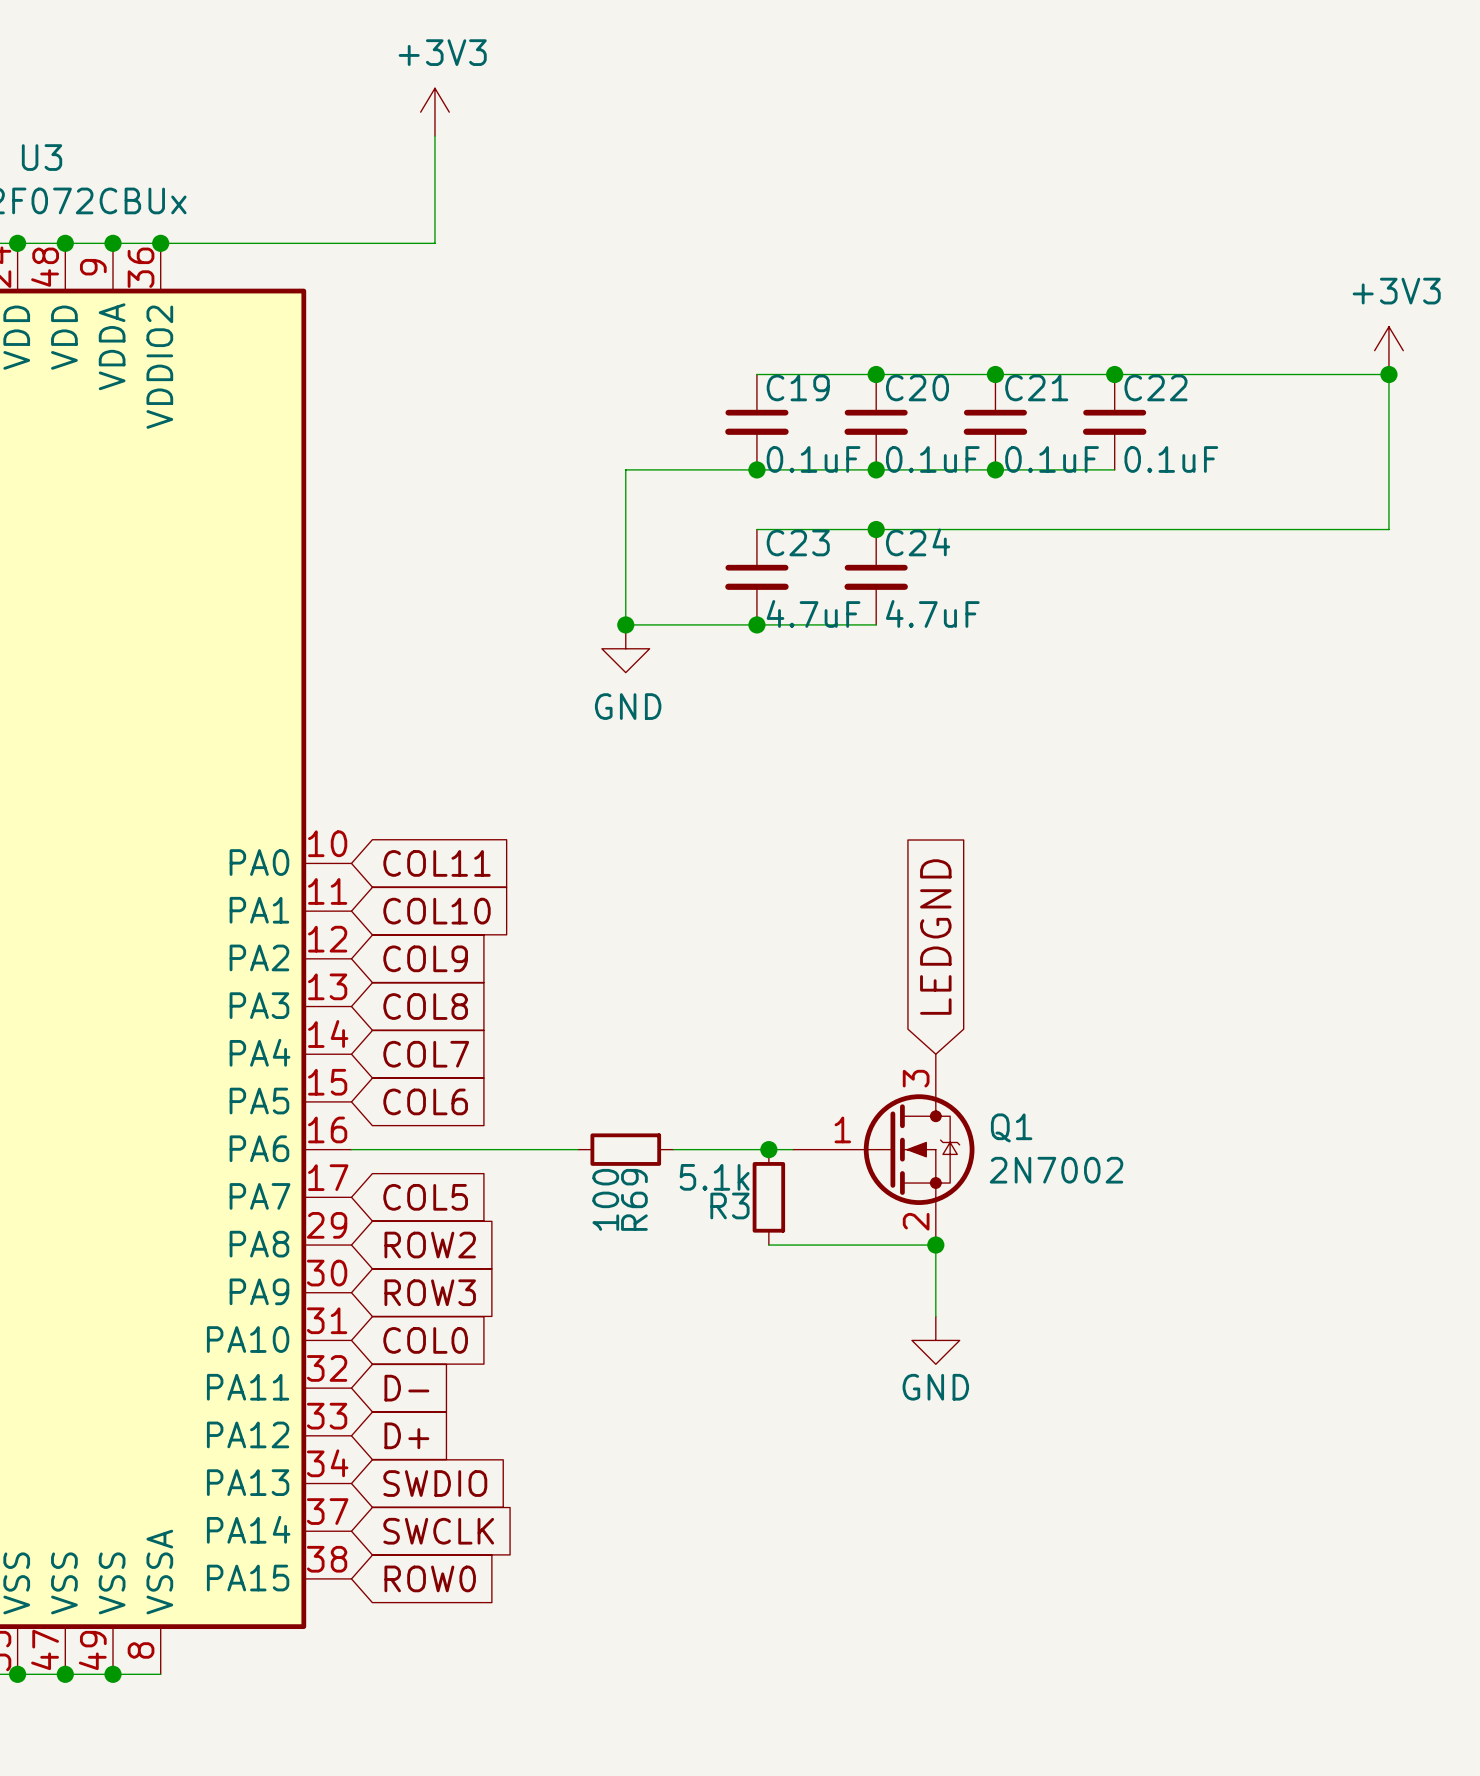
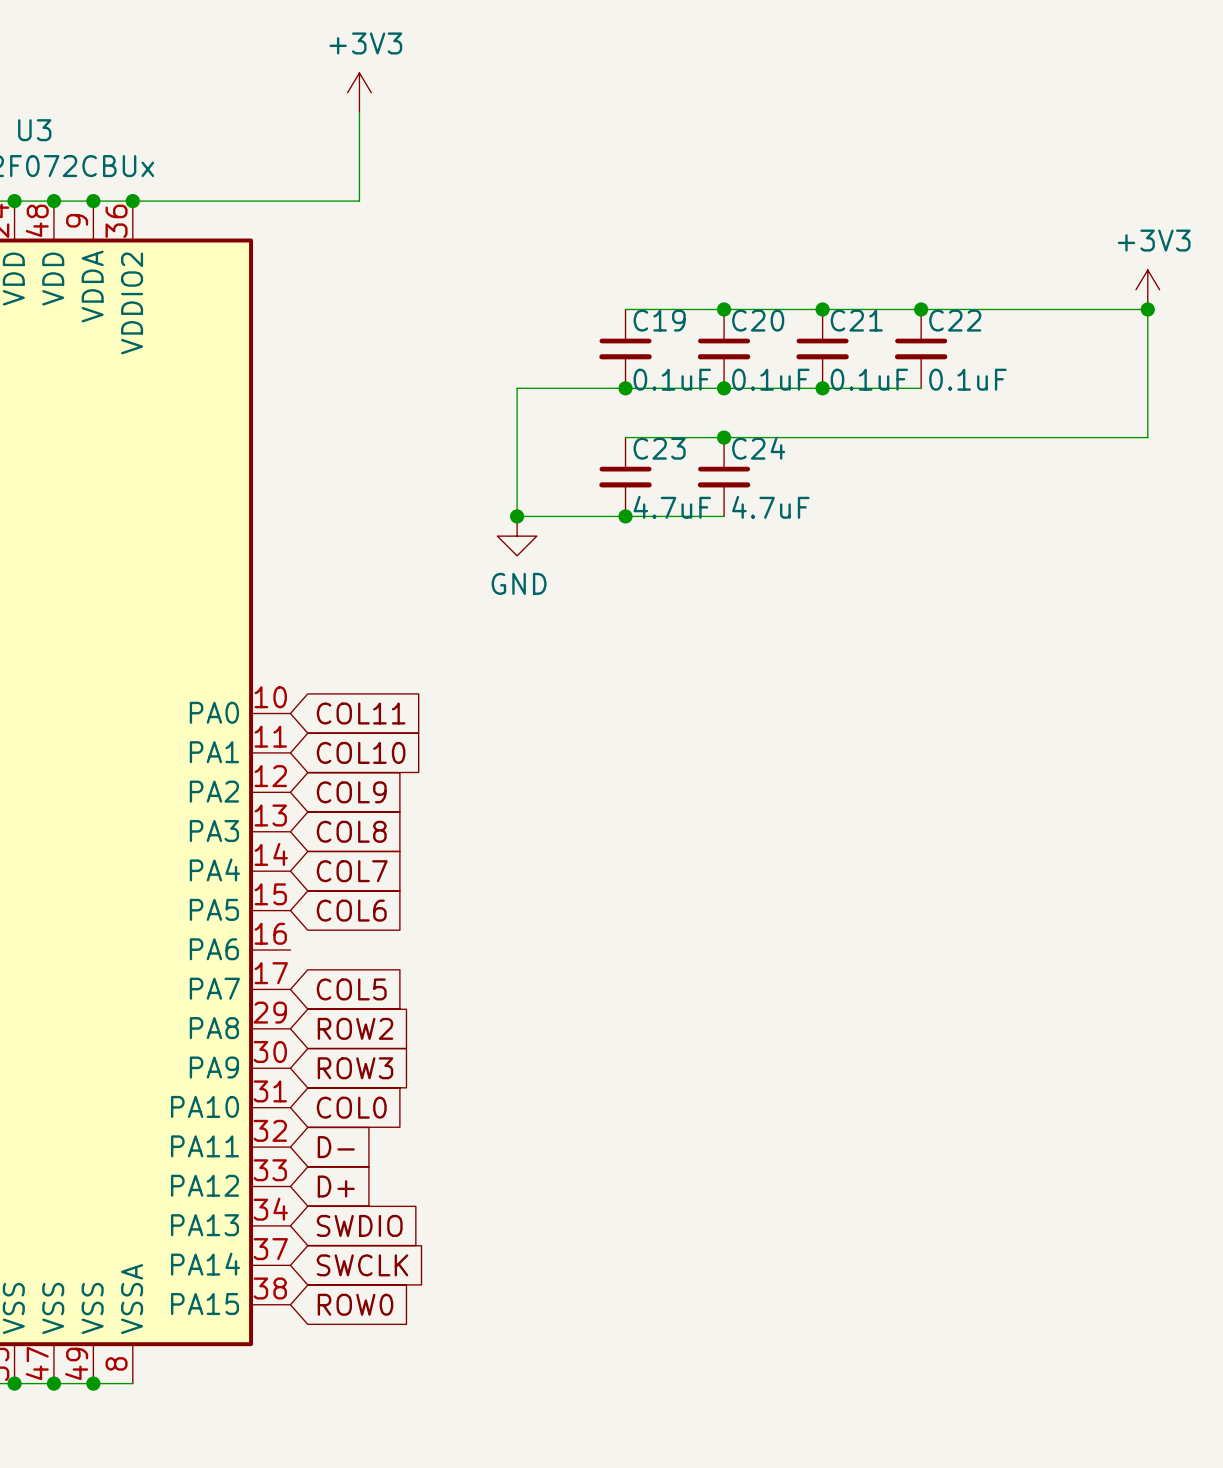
global label: LEDGND (935, 937) -> none
wire: (351, 1149) (578, 1149) -> none
R69: 100 (625, 1149) -> none
wire: (673, 1149) (792, 1149) -> none
junction: (768, 1149) -> none
Q1: 2N7002 (883, 1149) -> none
R3: 5.1k (768, 1197) -> none
wire: (768, 1245) (935, 1245) (935, 1316) -> none
junction: (935, 1245) -> none
power symbol: GND (935, 1340) -> none

